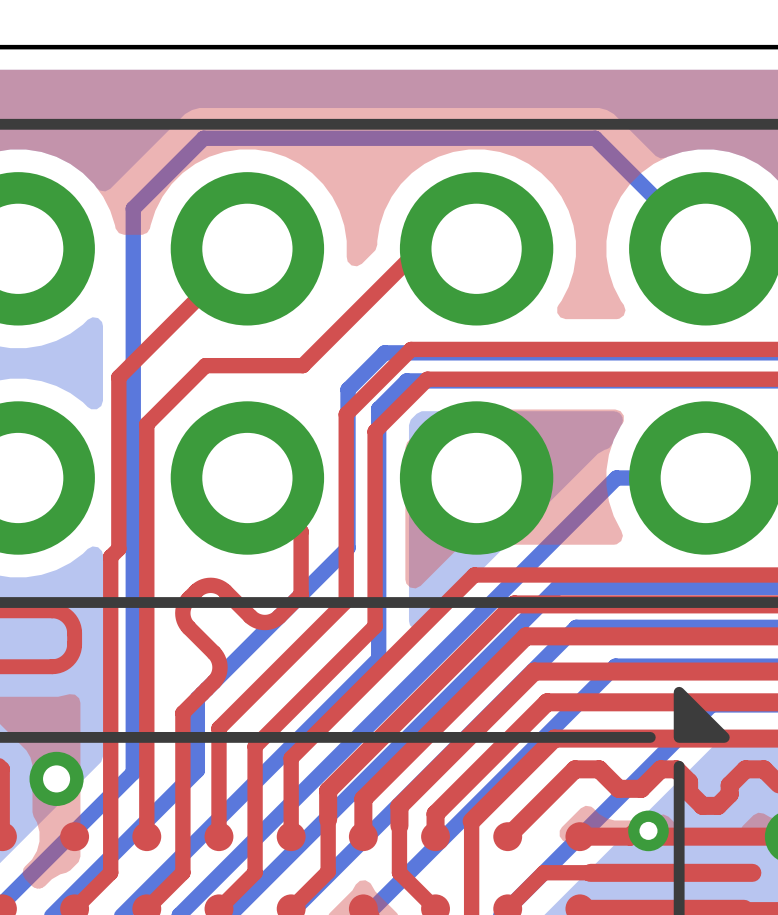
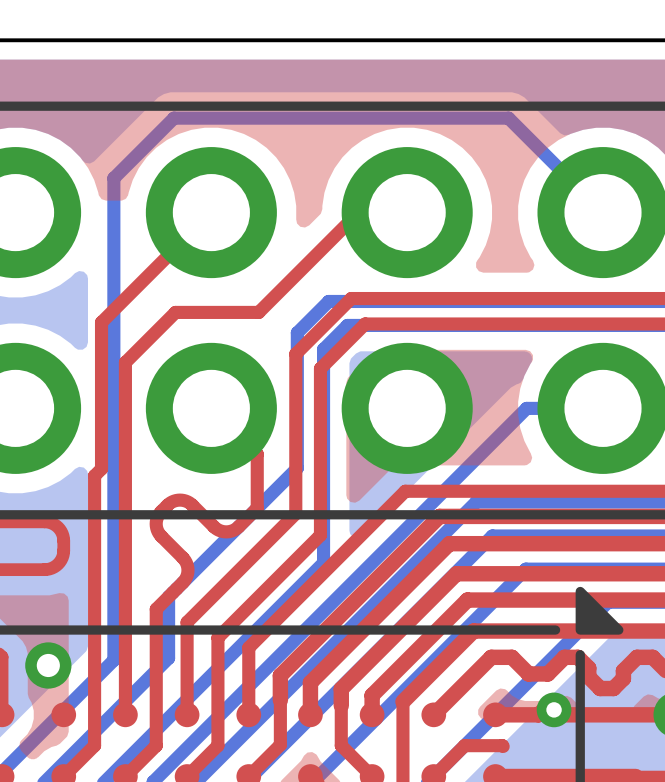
top track: (590, 872) (752, 872) -> none

